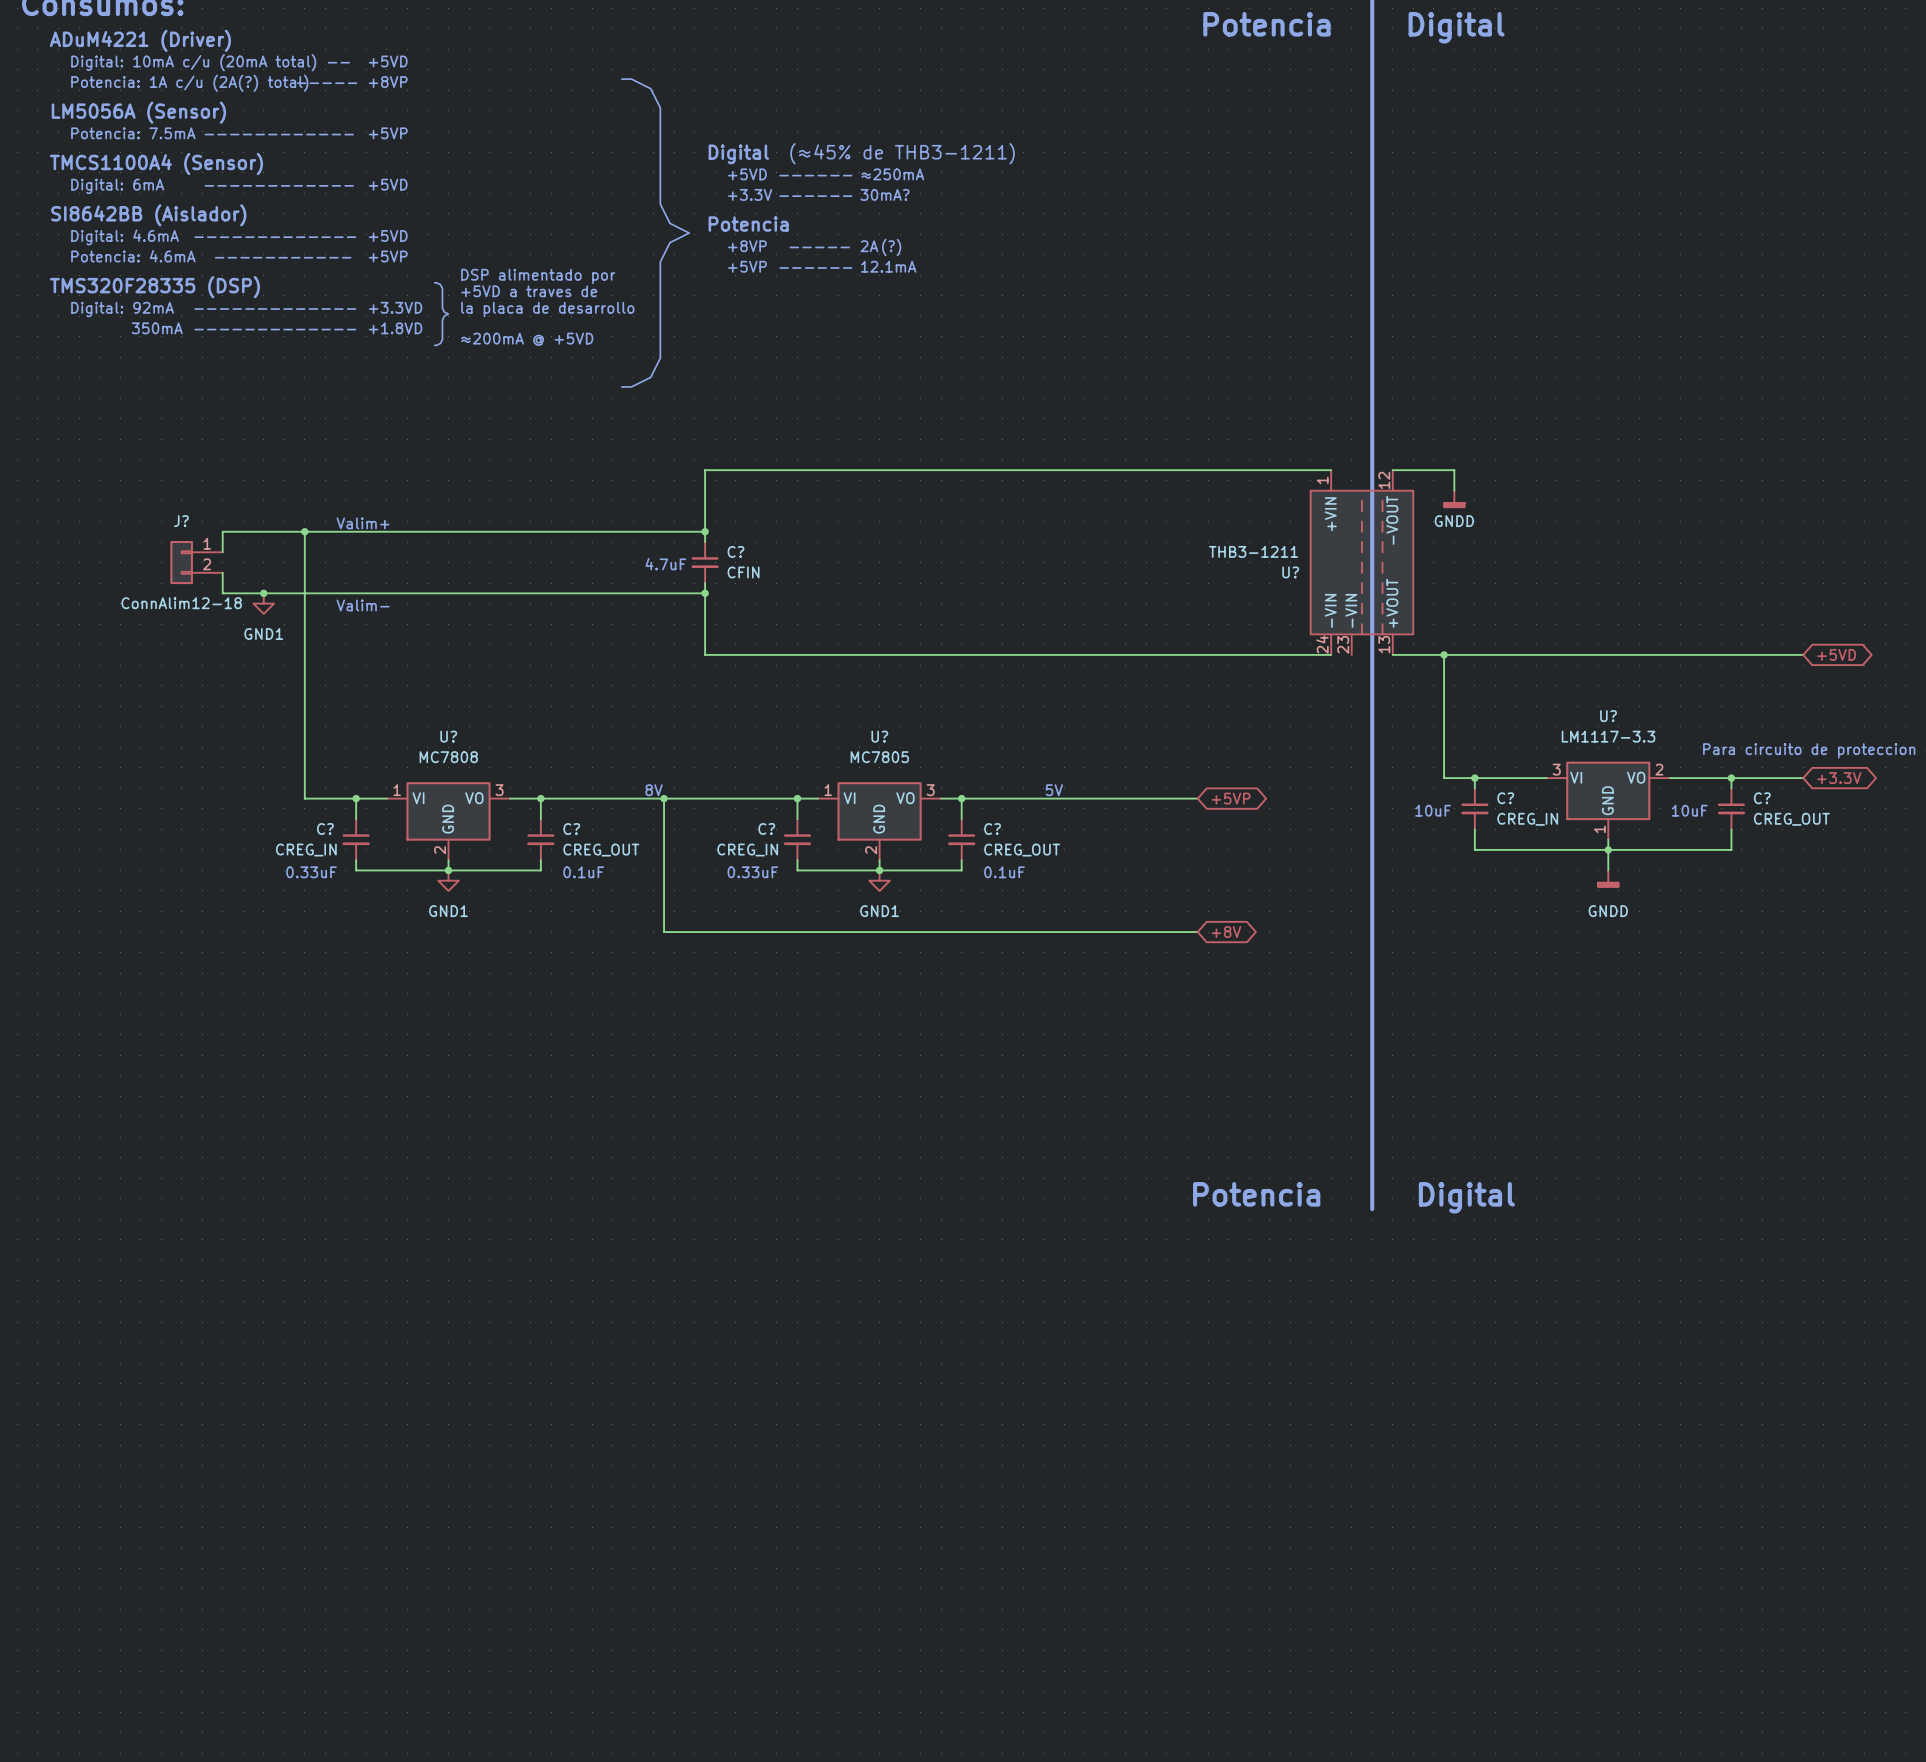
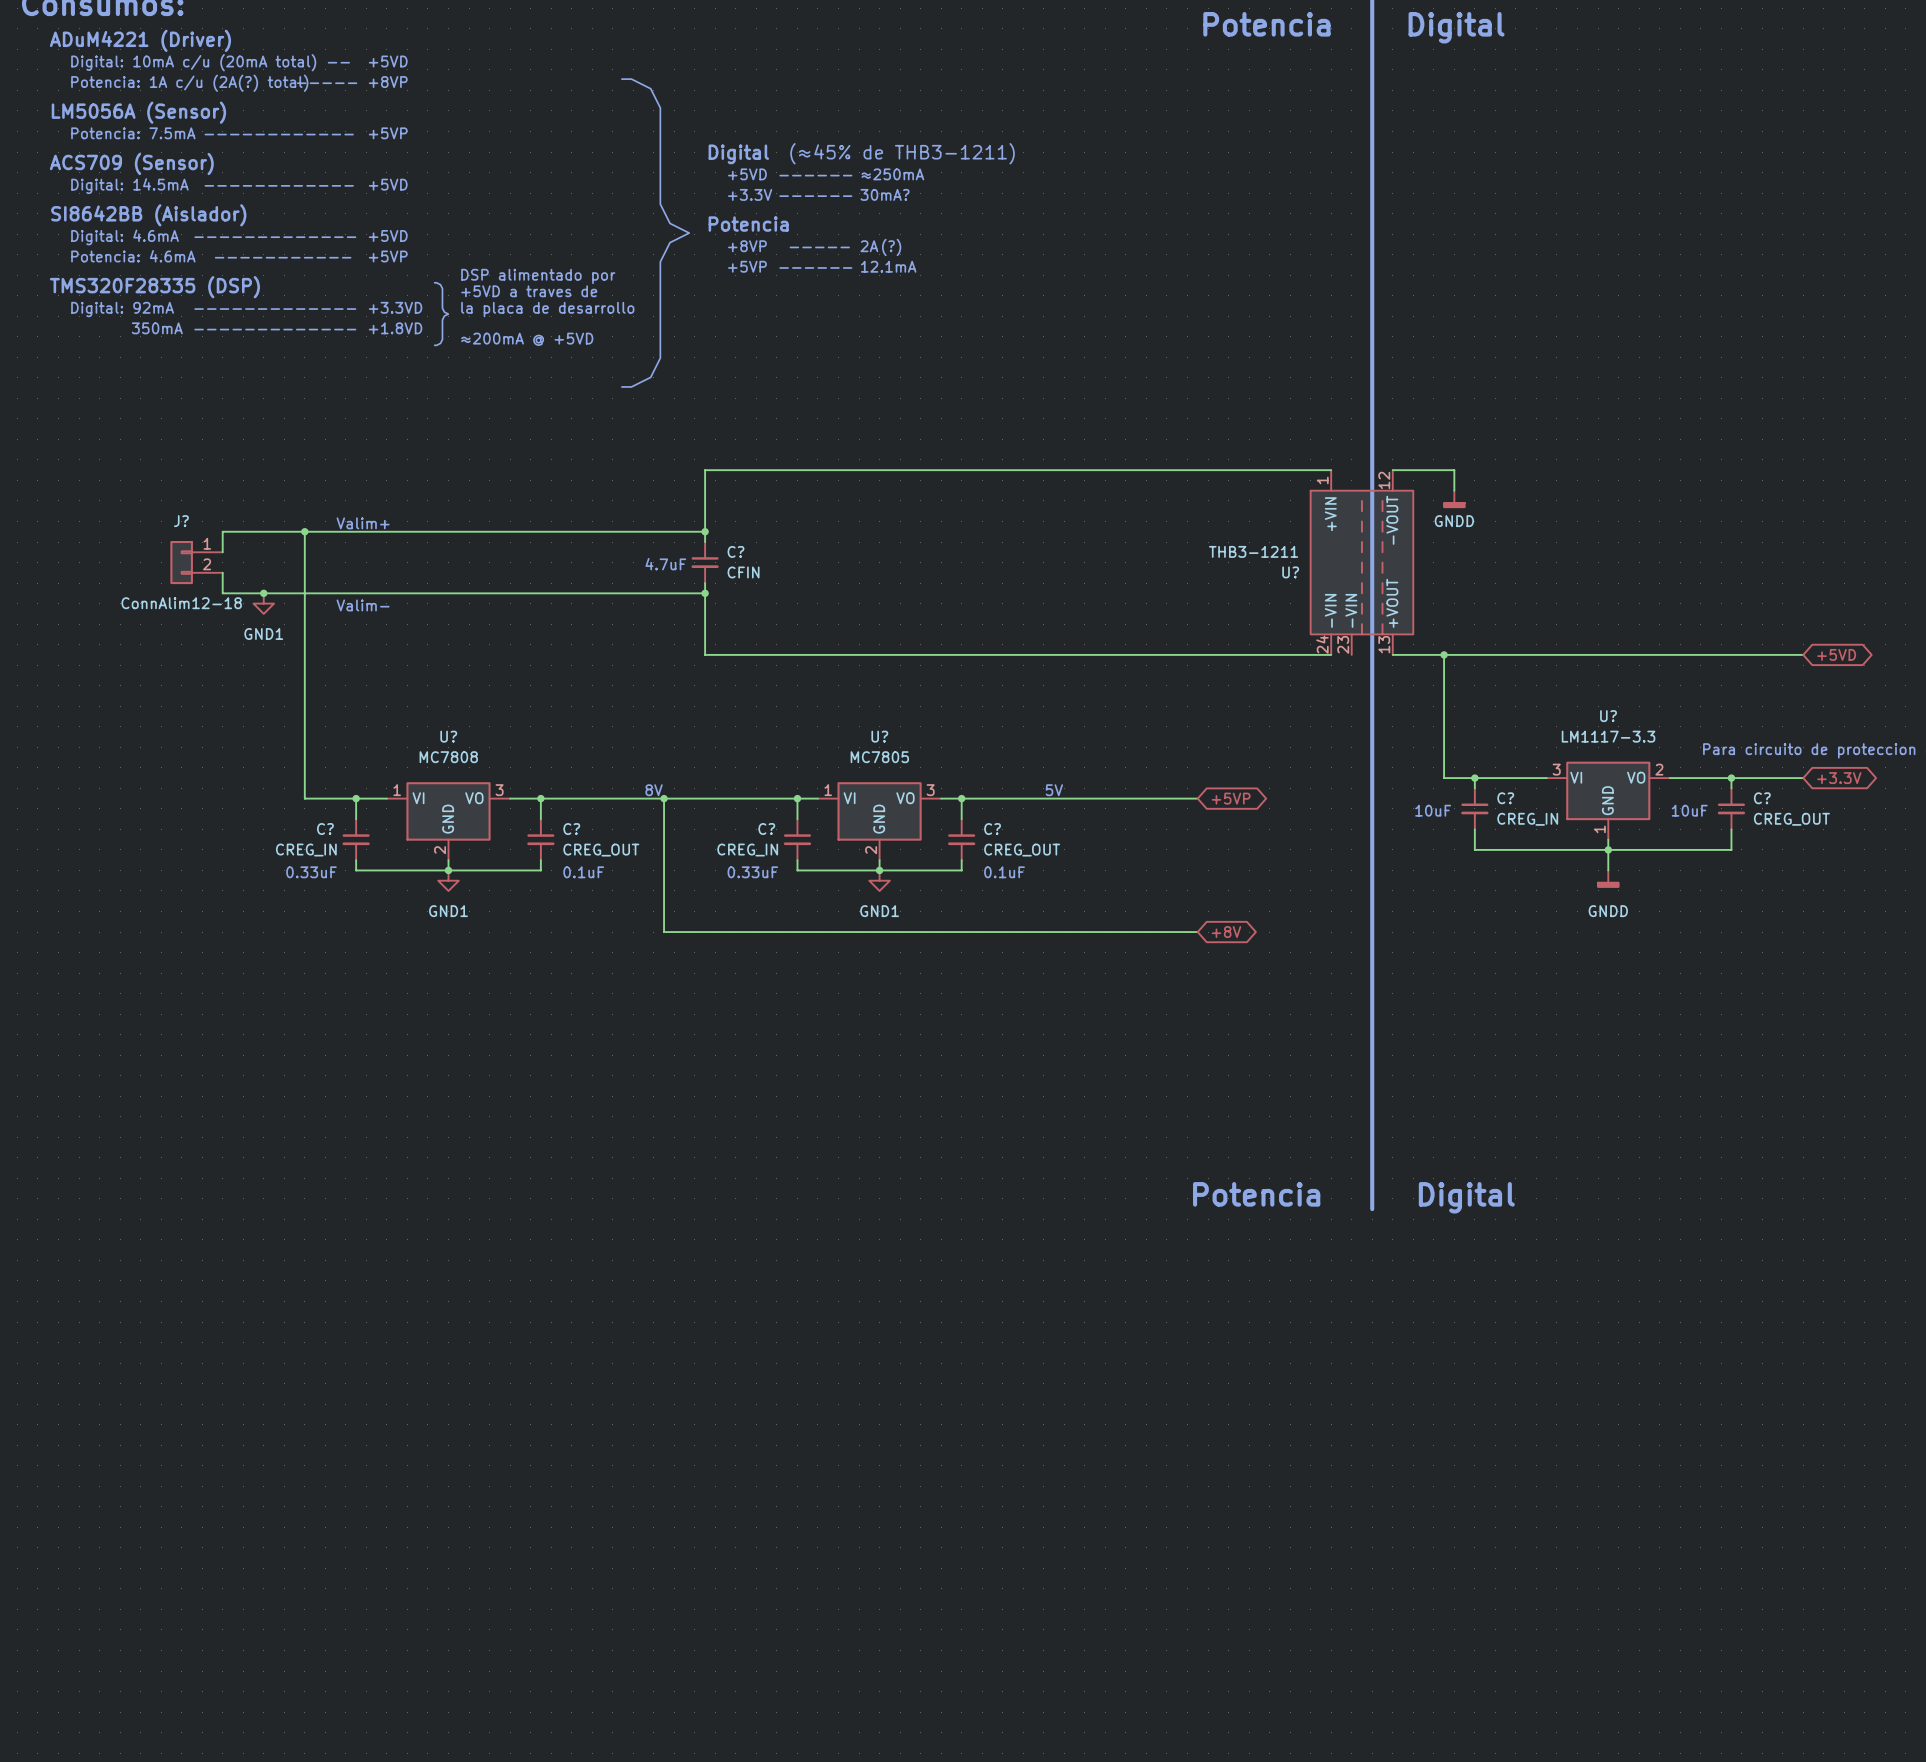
text: TMCS1100A4 (Sensor) (156, 164) -> ACS709 (Sensor) (131, 164)
text: Digital: 6mA (117, 186) -> Digital: 14.5mA (129, 186)

